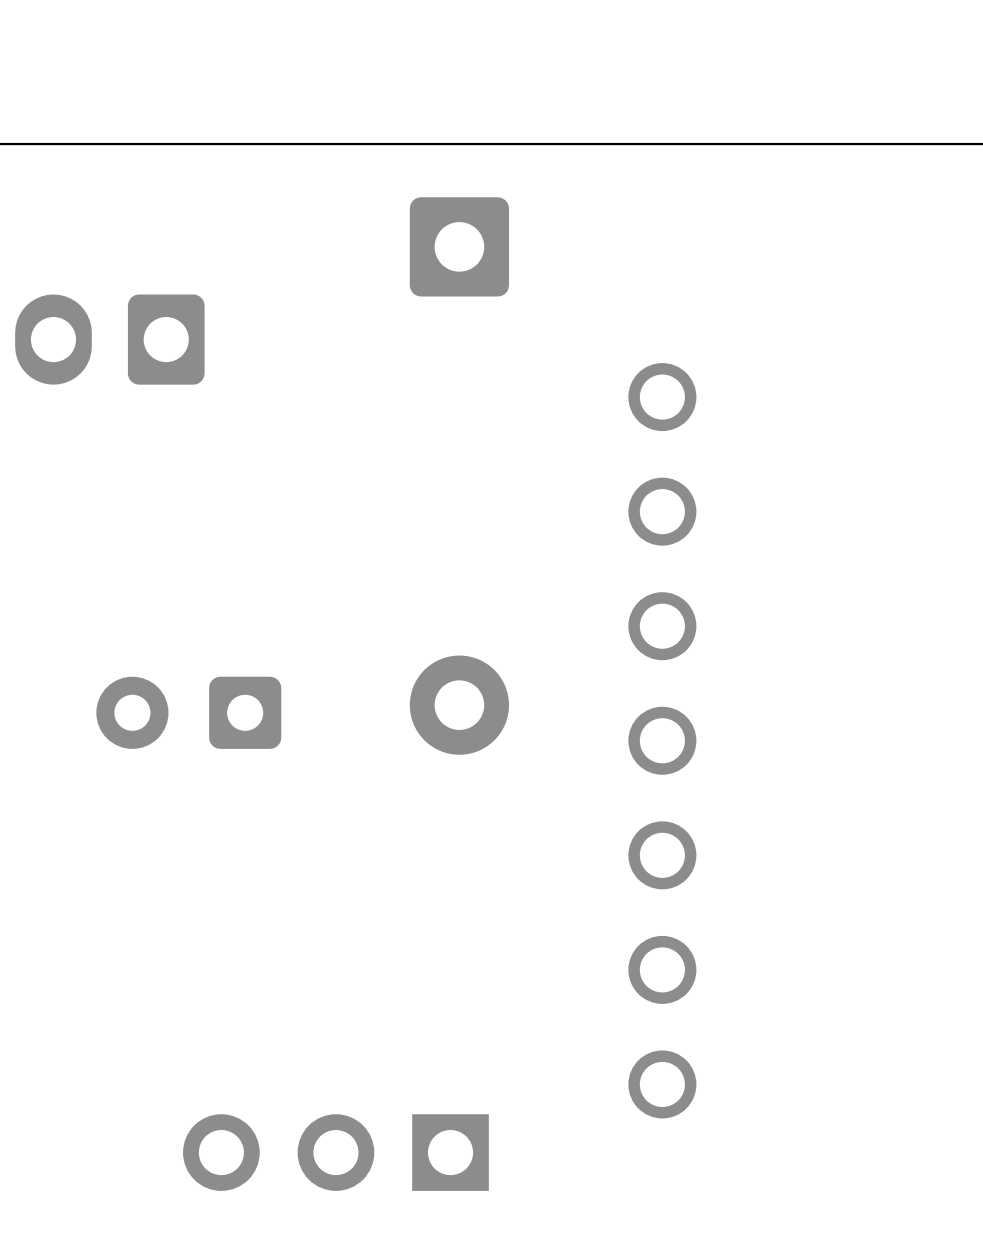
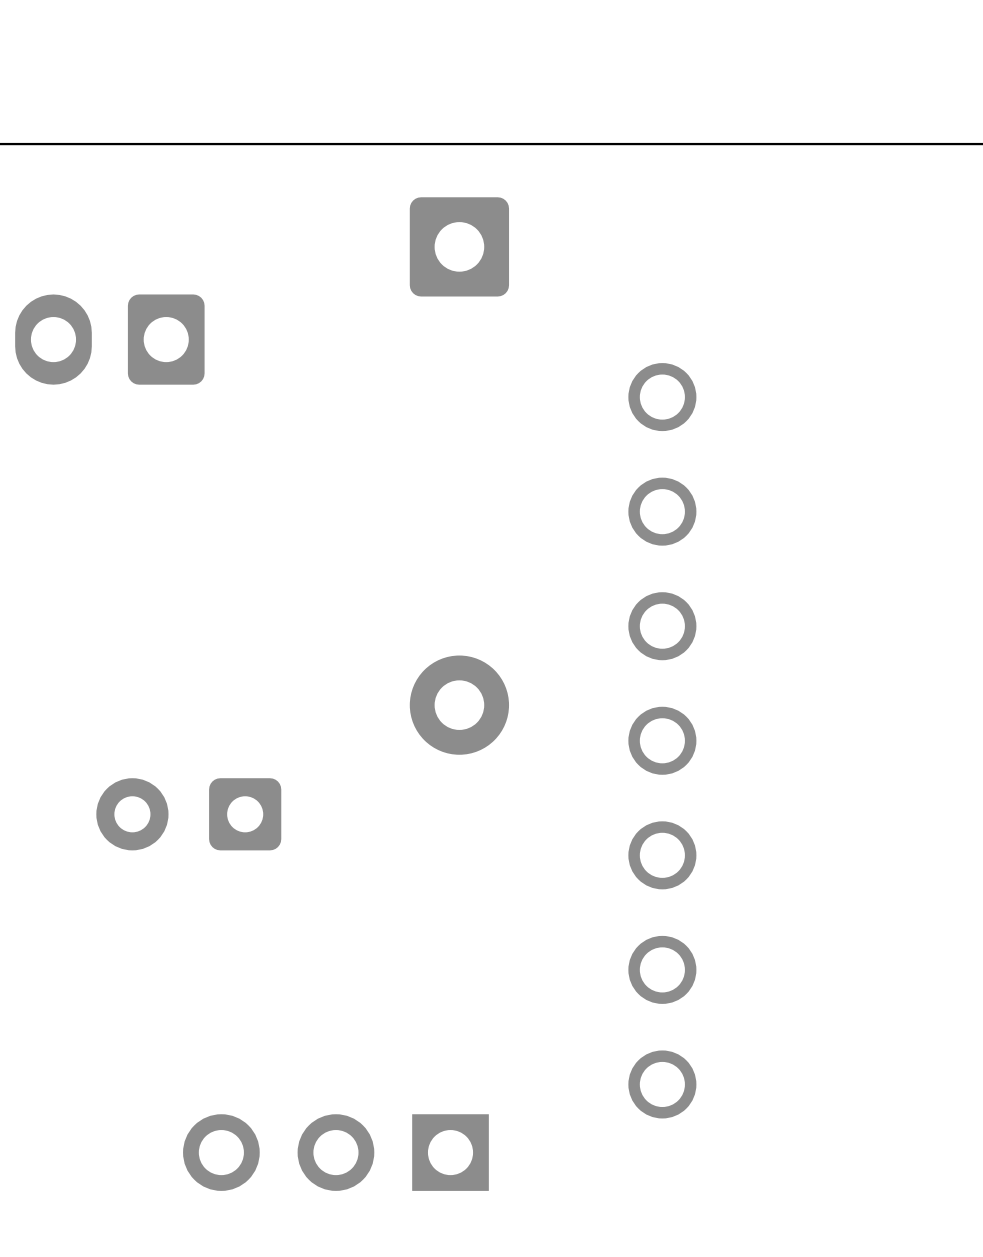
part position: (188, 712) -> (188, 814)

